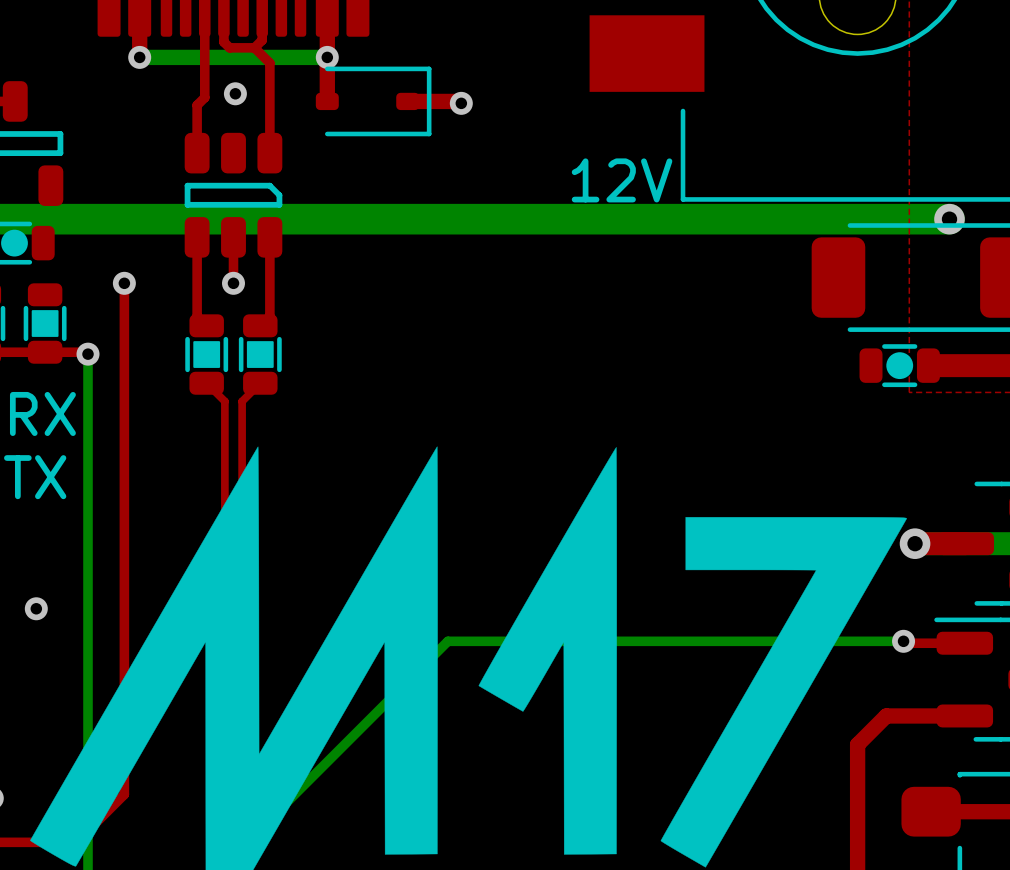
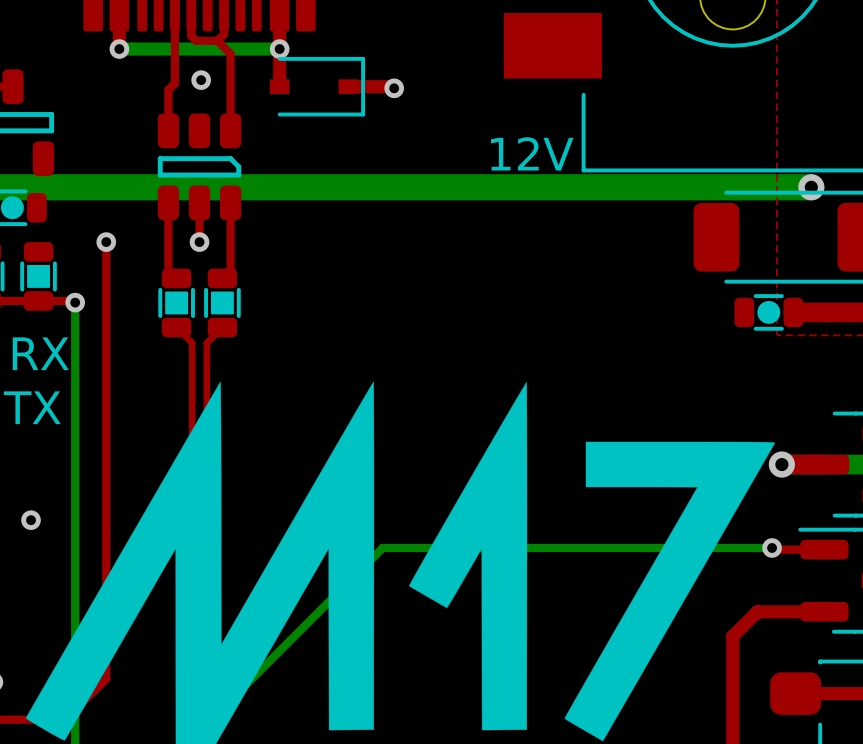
part footprint: [315, 66, 432, 137] -> [269, 56, 366, 117]

